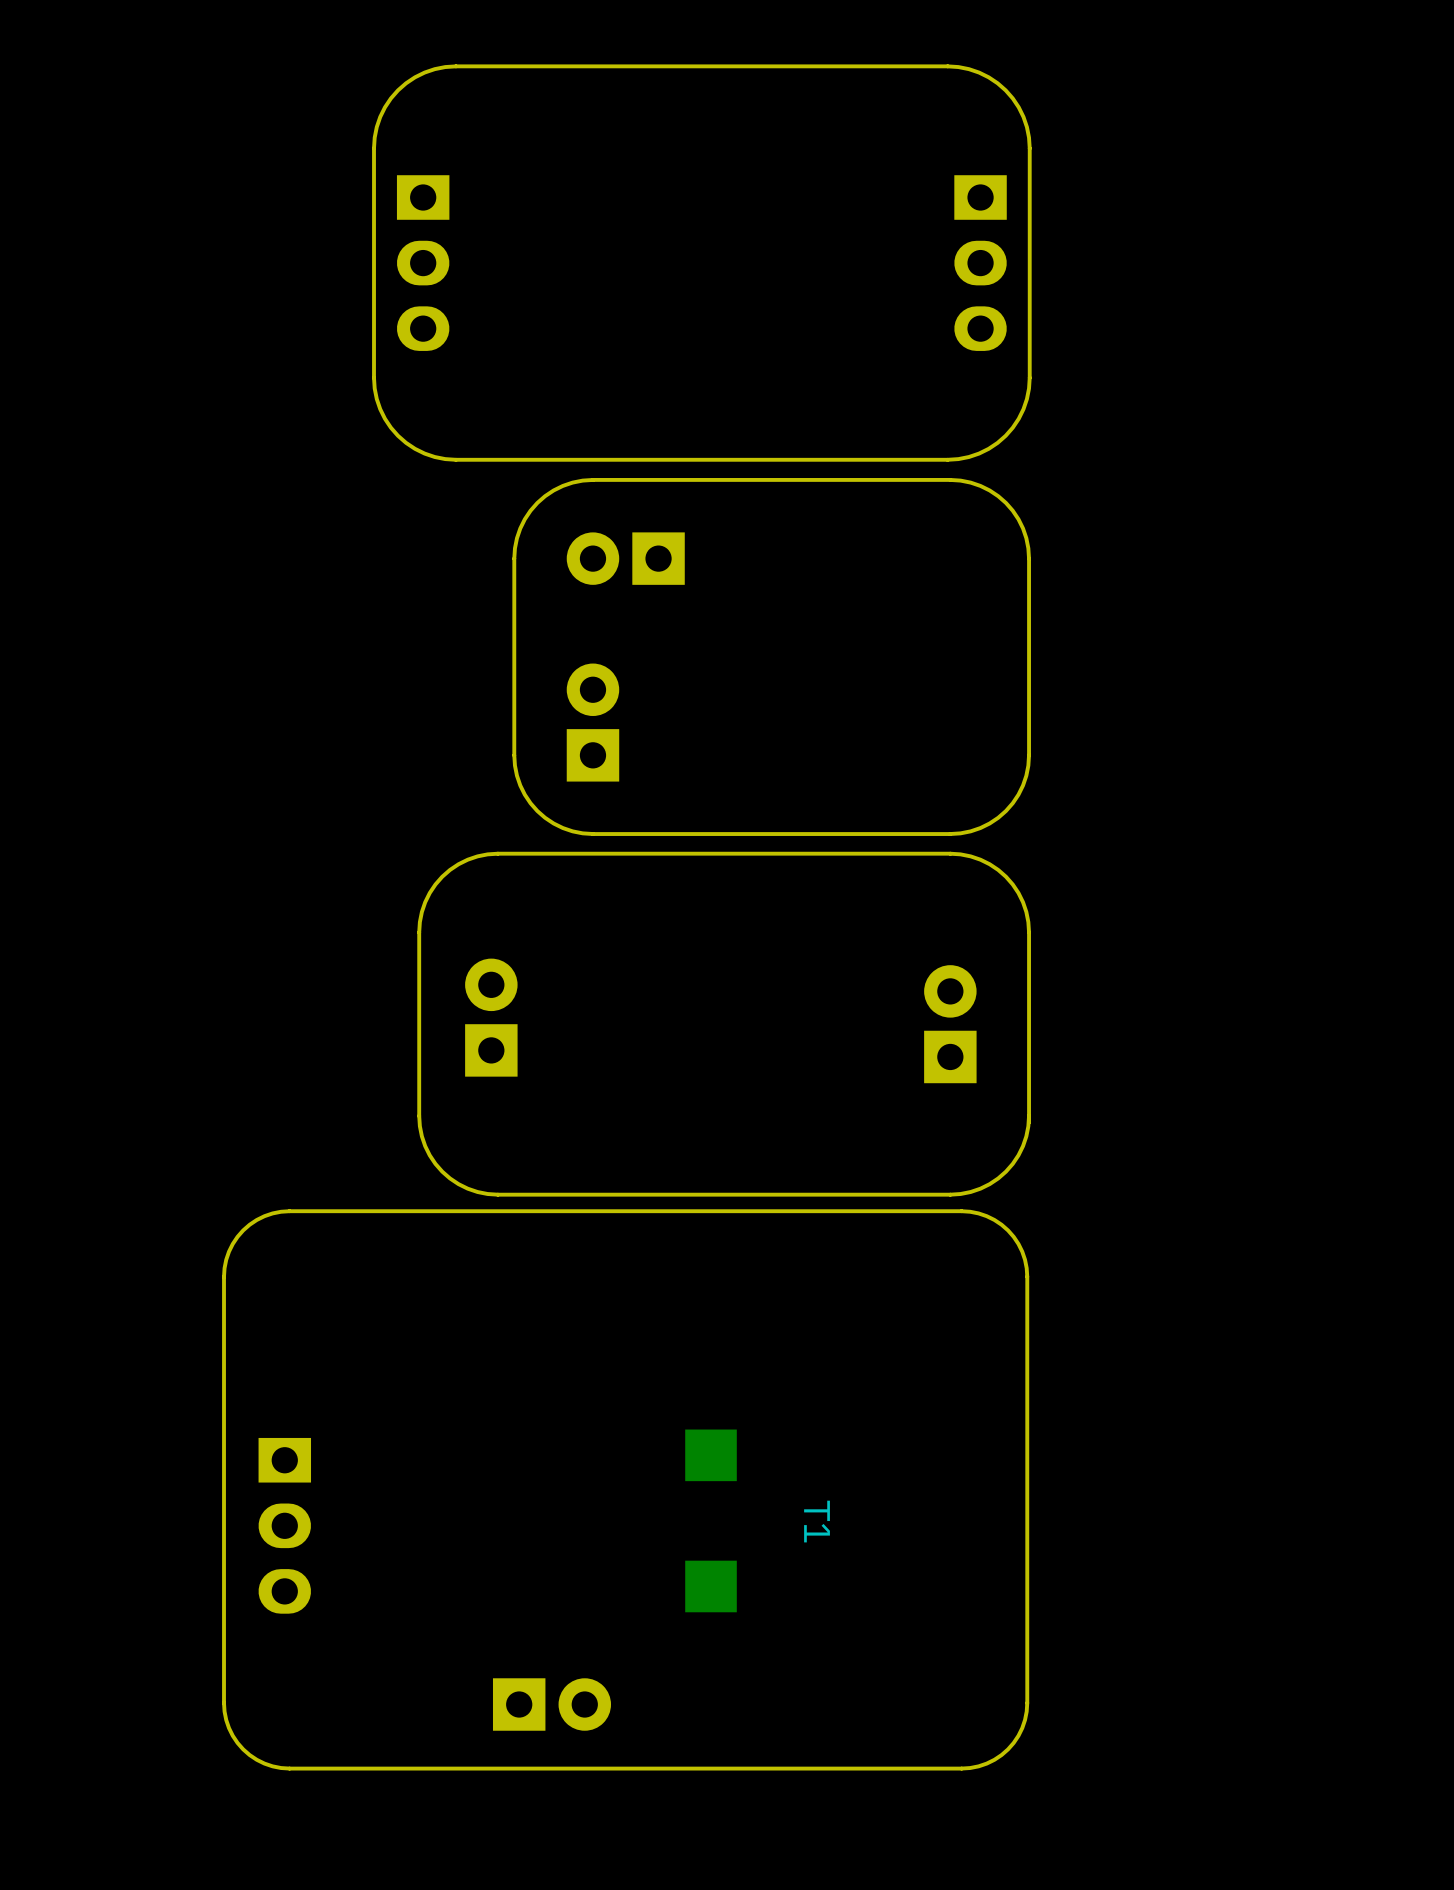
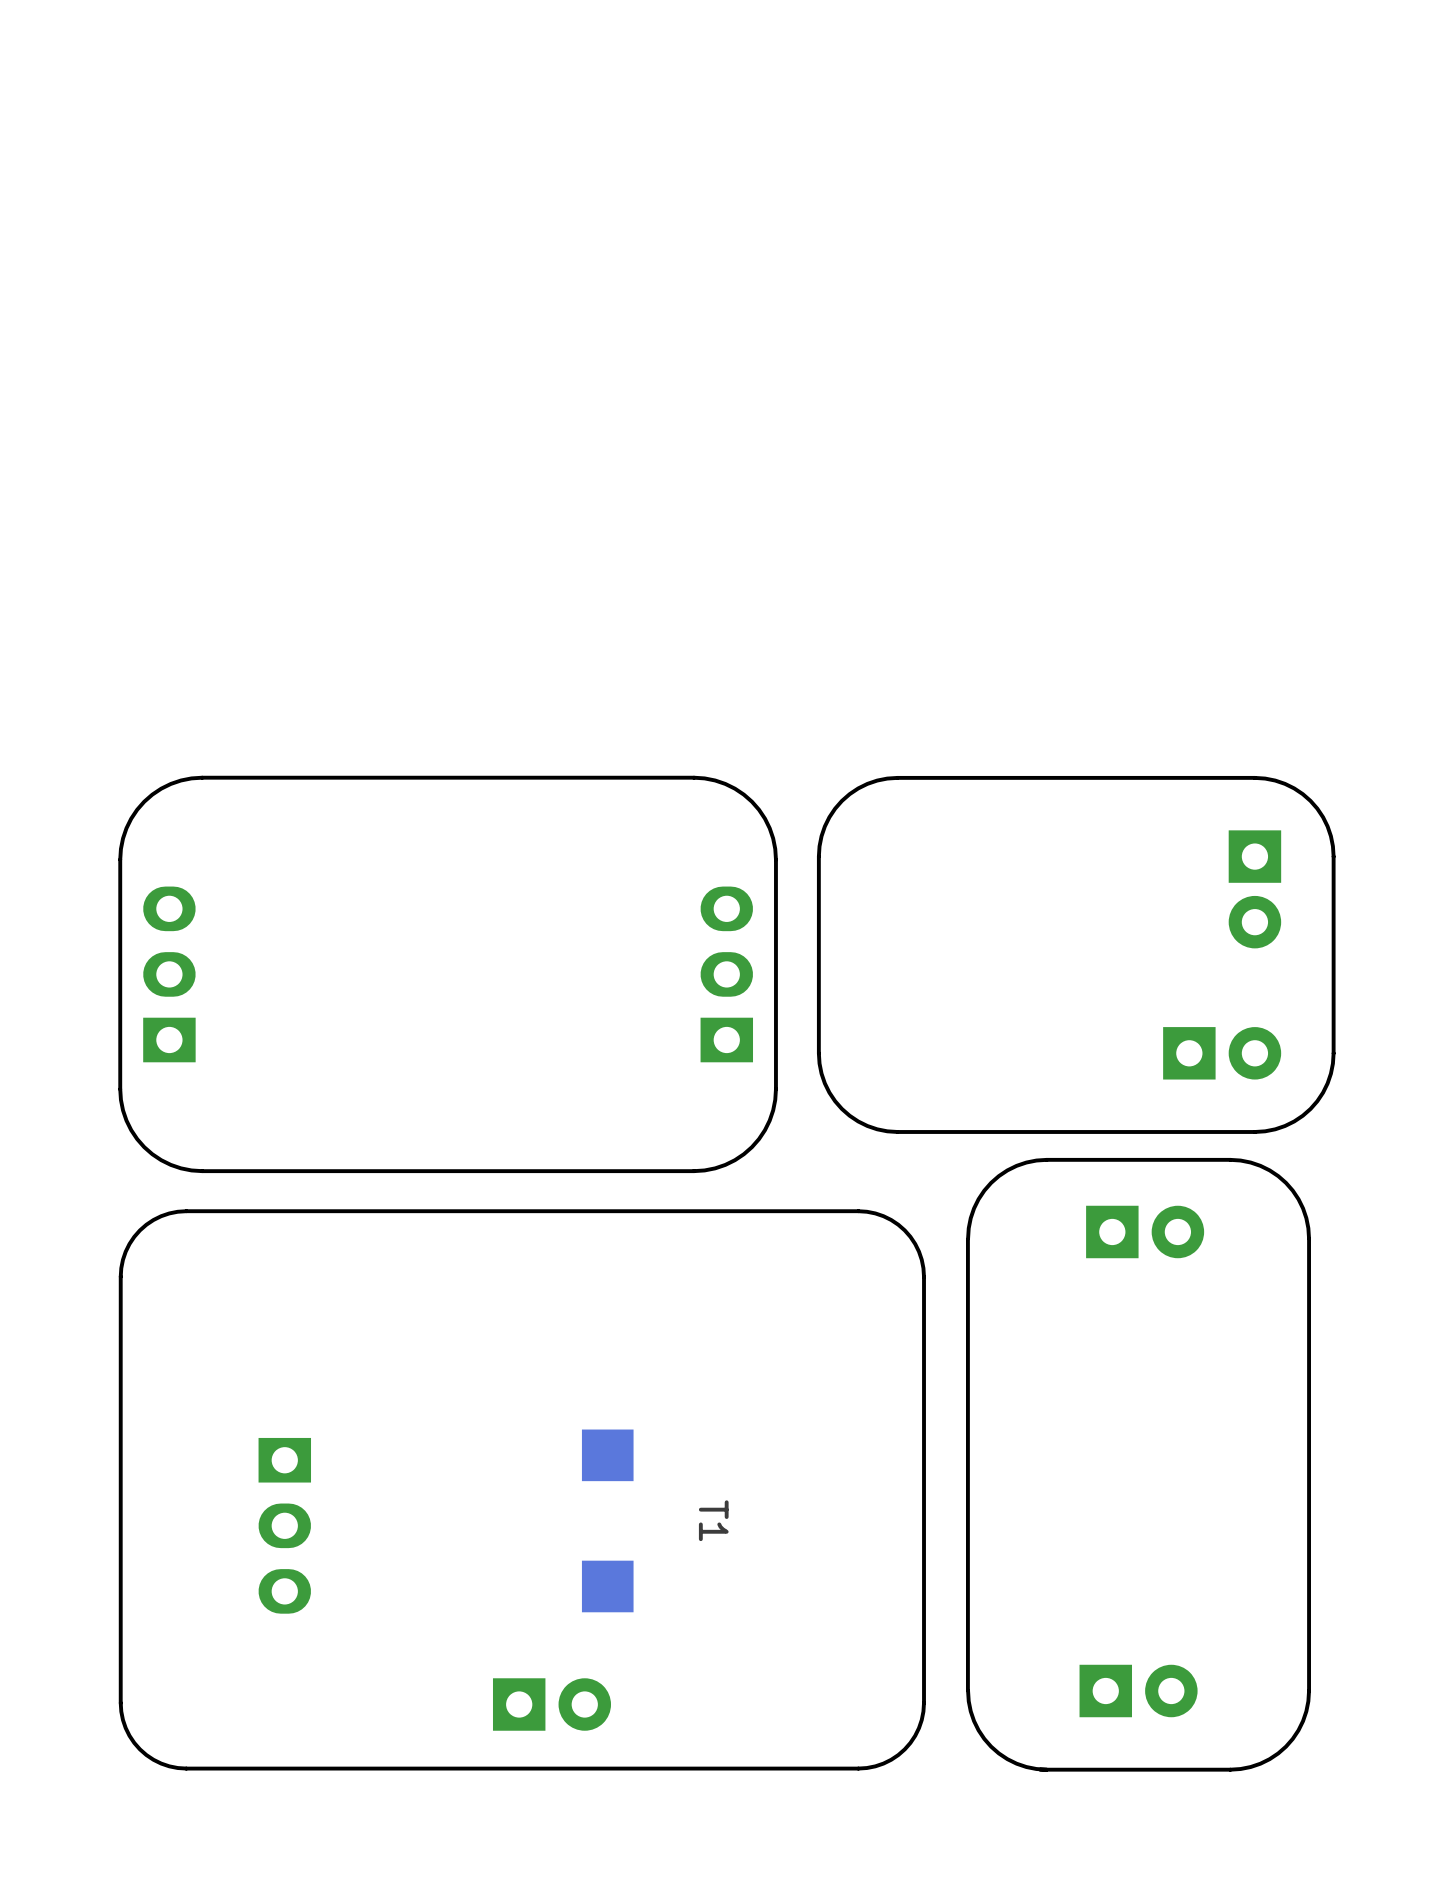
board edge: (947, 66) (455, 66) (434, 69) (414, 77) (390, 98) (380, 116) (374, 137) (374, 377) (376, 399) (384, 418) (398, 435) (414, 448) (434, 457) (455, 459) (947, 459) (968, 457) (988, 448) (1012, 427) (1023, 409) (1029, 388) (1029, 137) (1018, 107) (997, 83) (968, 69) (947, 66) -> none
part: (423, 263) -> none
part: (980, 263) -> none
board edge: (950, 479) (592, 479) (572, 482) (545, 496) (530, 510) (520, 528) (514, 558) (514, 765) (520, 785) (530, 803) (553, 823) (572, 831) (592, 834) (950, 834) (980, 828) (998, 817) (1018, 794) (1028, 765) (1028, 548) (1023, 528) (1005, 502) (980, 485) (950, 479) -> (1254, 777) (897, 777) (867, 783) (849, 794) (829, 817) (821, 836) (818, 856) (819, 1063) (824, 1083) (835, 1101) (858, 1121) (877, 1129) (897, 1131) (1254, 1131) (1285, 1126) (1302, 1115) (1323, 1092) (1332, 1063) (1332, 846) (1327, 826) (1310, 800) (1285, 783) (1254, 777)
part: (625, 558) -> none
part: (592, 722) -> none
board edge: none -> (694, 777) (202, 777) (180, 780) (161, 788) (144, 801) (131, 818) (120, 848) (120, 1089) (123, 1110) (131, 1130) (144, 1147) (161, 1160) (180, 1168) (202, 1171) (694, 1171) (715, 1168) (734, 1160) (759, 1139) (769, 1120) (775, 1099) (775, 848) (764, 818) (743, 794) (715, 780) (694, 777)
part: none -> (1254, 889)
part: none -> (169, 974)
part: none -> (726, 974)
part: (491, 1017) -> none
part: (950, 1024) -> none
part: none -> (1222, 1053)
board edge: (1029, 1115) (1028, 1126) (1023, 1146) (1005, 1171) (980, 1188) (960, 1194) (497, 1194) (467, 1188) (449, 1178) (435, 1163) (425, 1146) (419, 1126) (419, 932) (425, 902) (435, 884) (449, 869) (467, 859) (487, 854) (950, 853) (980, 859) (998, 869) (1012, 884) (1023, 902) (1028, 922) (1029, 932) (1029, 1122) -> none
board edge: (289, 1211) (264, 1216) (243, 1230) (228, 1251) (223, 1276) (224, 1711) (232, 1735) (243, 1749) (264, 1763) (289, 1768) -> (289, 1211) (186, 1211) (161, 1216) (146, 1224) (134, 1236) (122, 1259) (120, 1276) (120, 1703) (125, 1728) (139, 1749) (153, 1759) (169, 1766) (186, 1768) (289, 1768)
board edge: (858, 1211) (961, 1211) (986, 1216) (1001, 1224) (1013, 1236) (1022, 1251) (1027, 1276) (1027, 1703) (1022, 1728) (1008, 1749) (994, 1759) (978, 1766) (961, 1768) (858, 1768) -> (858, 1211) (883, 1216) (904, 1230) (919, 1251) (924, 1276) (923, 1711) (919, 1728) (904, 1749) (883, 1763) (858, 1768)
part: none -> (1145, 1231)
board edge: none -> (968, 1238) (974, 1208) (991, 1182) (1016, 1165) (1046, 1159) (1230, 1159) (1250, 1162) (1269, 1170) (1286, 1182) (1303, 1208) (1308, 1228) (1309, 1691) (1306, 1711) (1298, 1730) (1286, 1746) (1269, 1759) (1240, 1769) (1040, 1769)
board edge: none -> (967, 1239) (967, 1690)
T1 position: (711, 1520) -> (607, 1520)
board edge: none -> (968, 1691) (974, 1721) (991, 1746) (1016, 1763) (1046, 1769)
part: none -> (1138, 1691)

